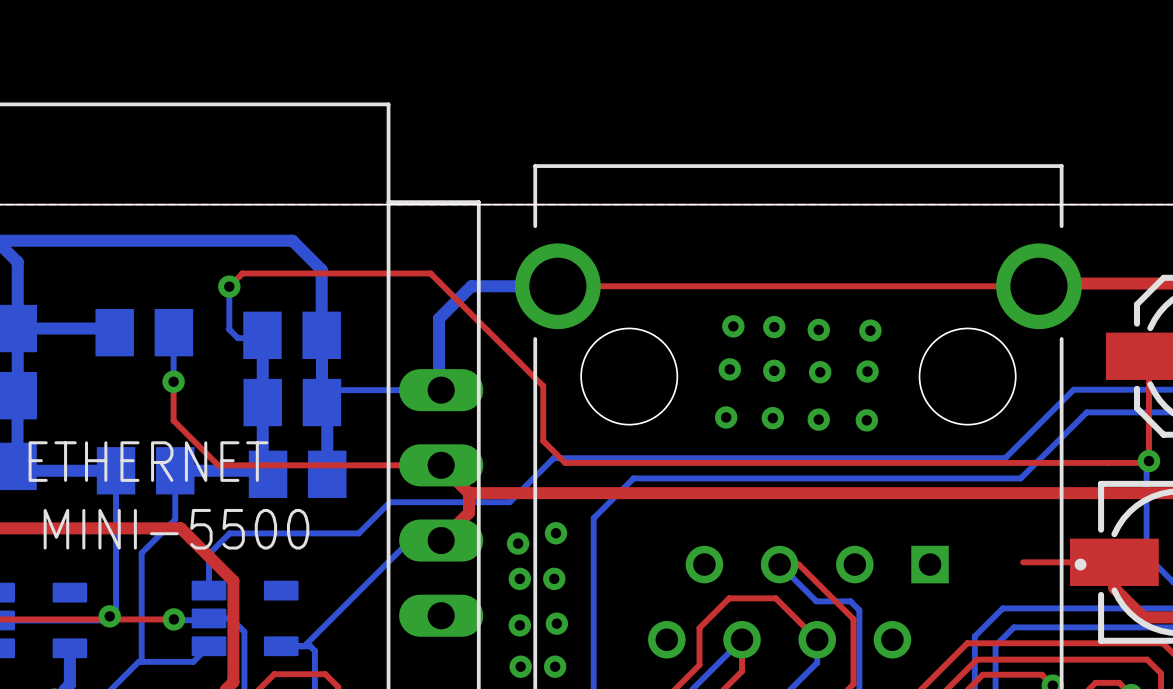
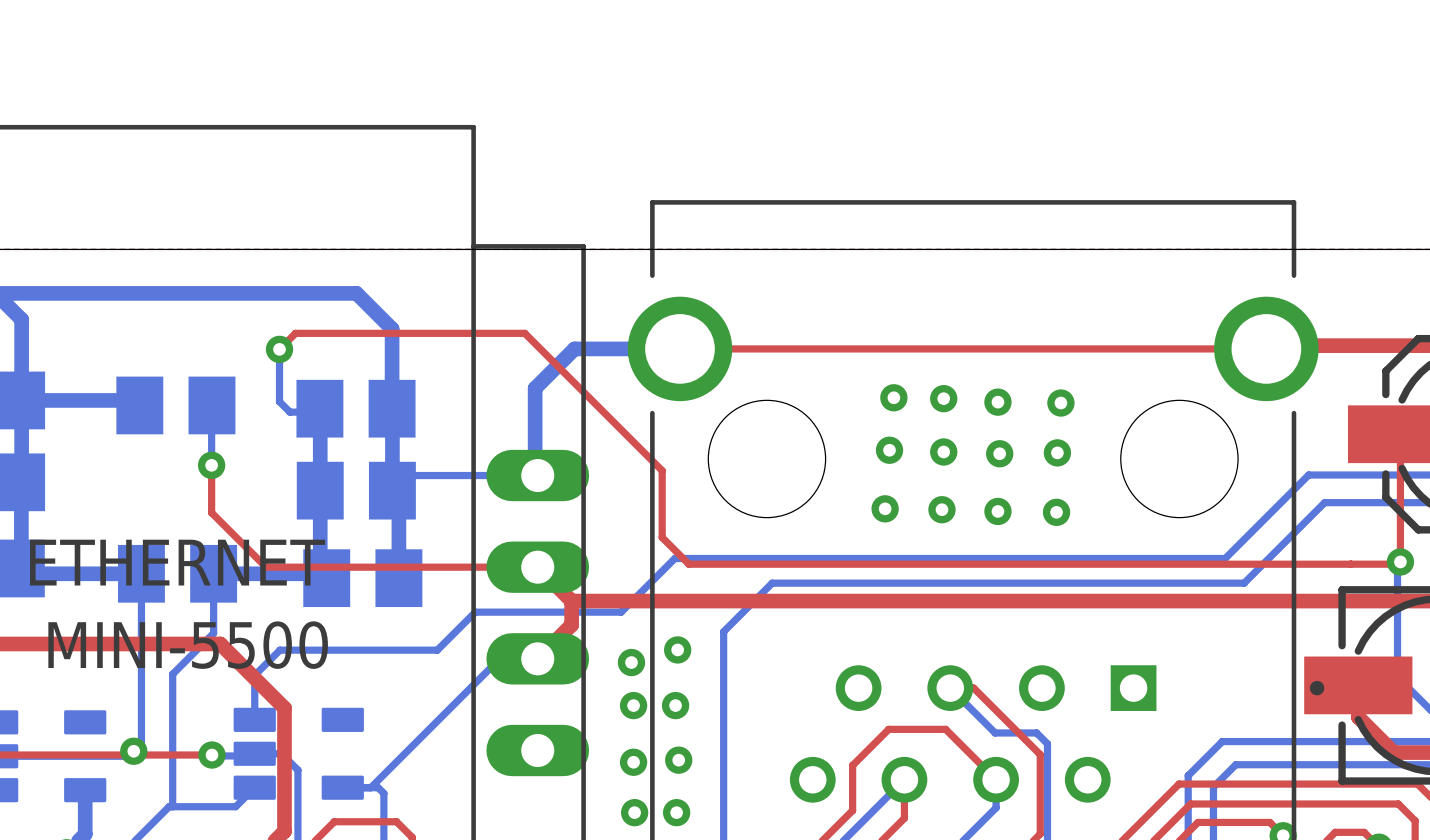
top track: (1023, 562) (1114, 562) -> none

